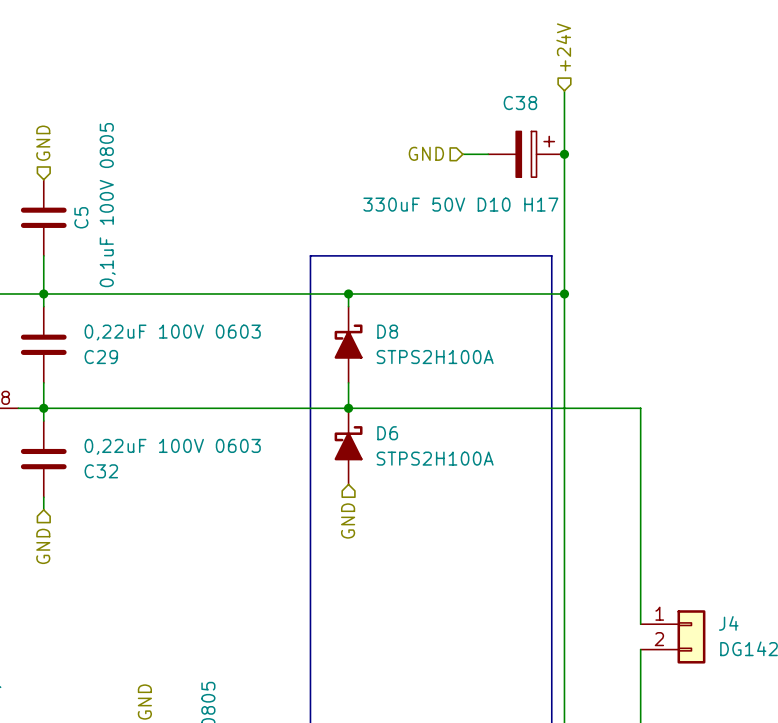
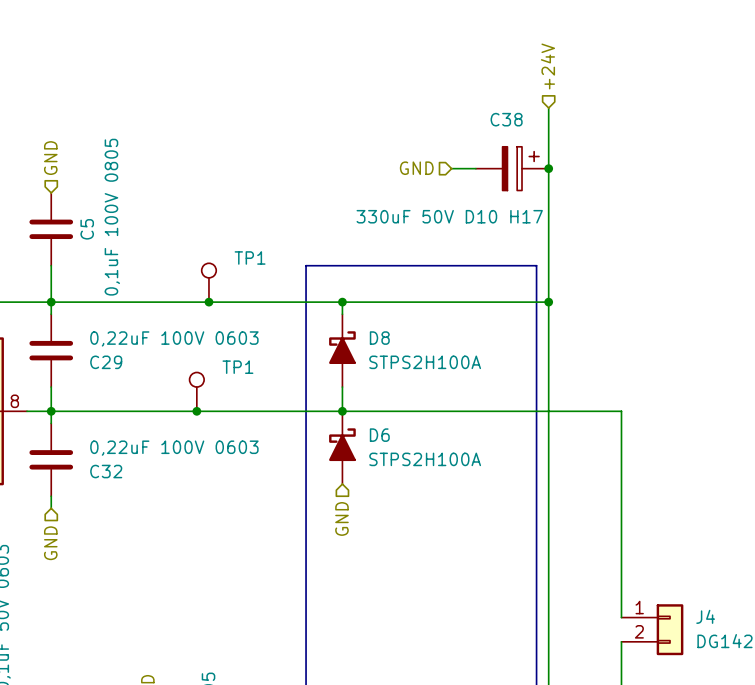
TP1: none -> (208, 282)
junction: none -> (208, 302)
TP1: none -> (196, 391)
junction: none -> (196, 411)

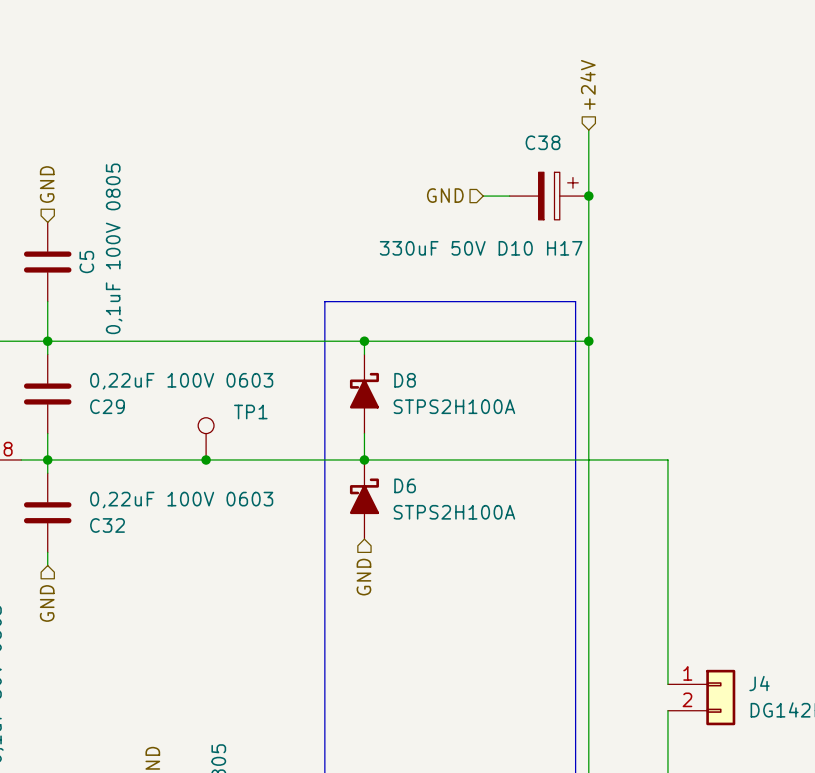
TP1: (208, 282) -> none
junction: (208, 302) -> none

